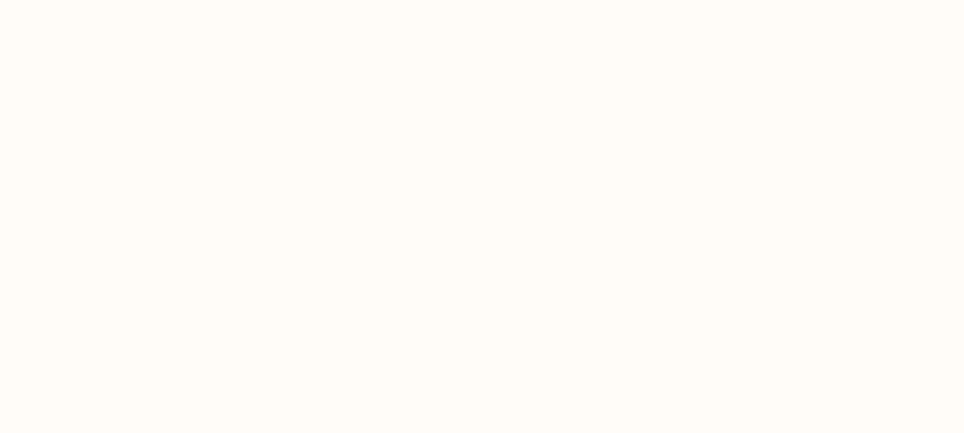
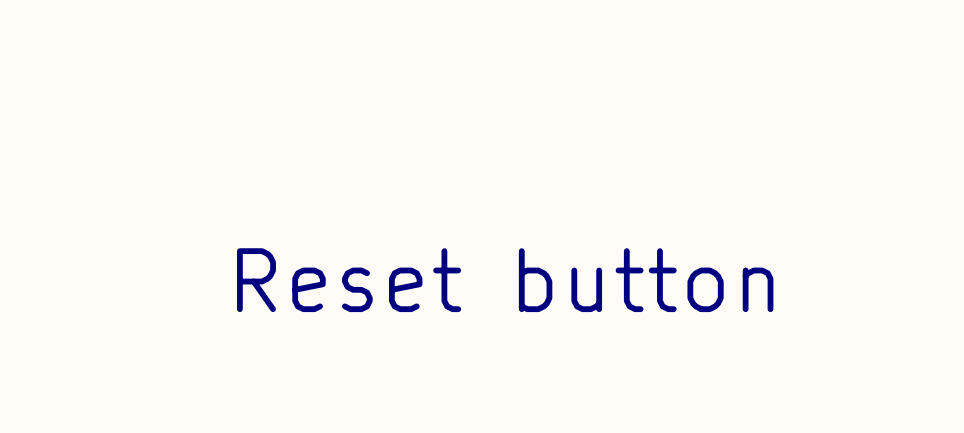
text: none -> Reset button (505, 280)

